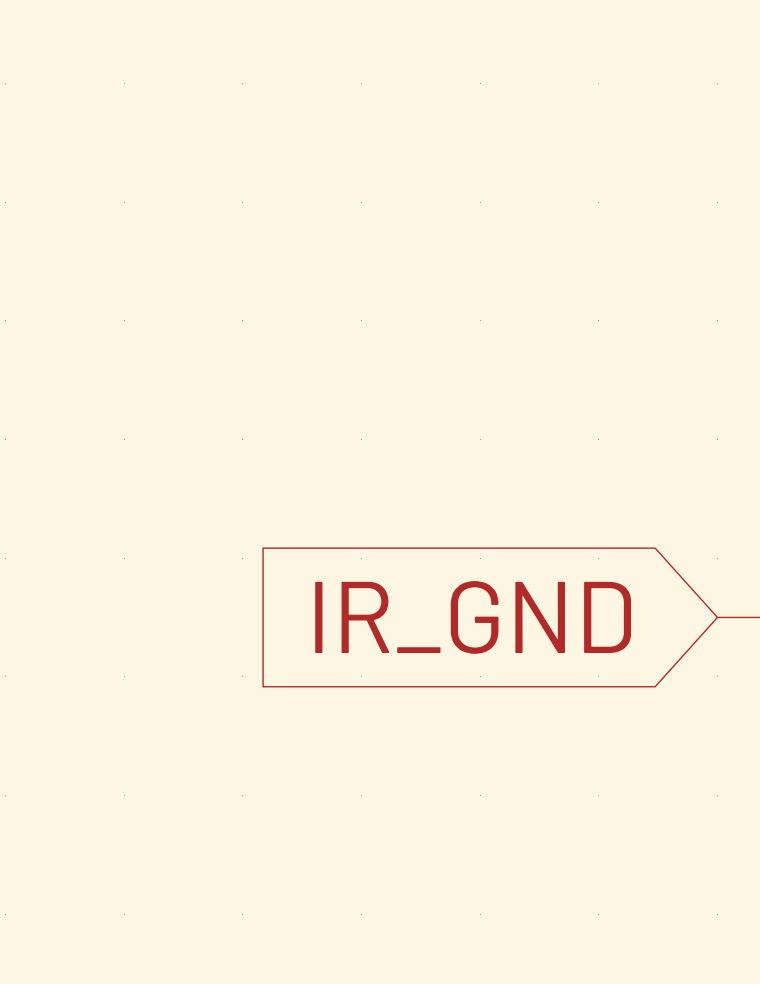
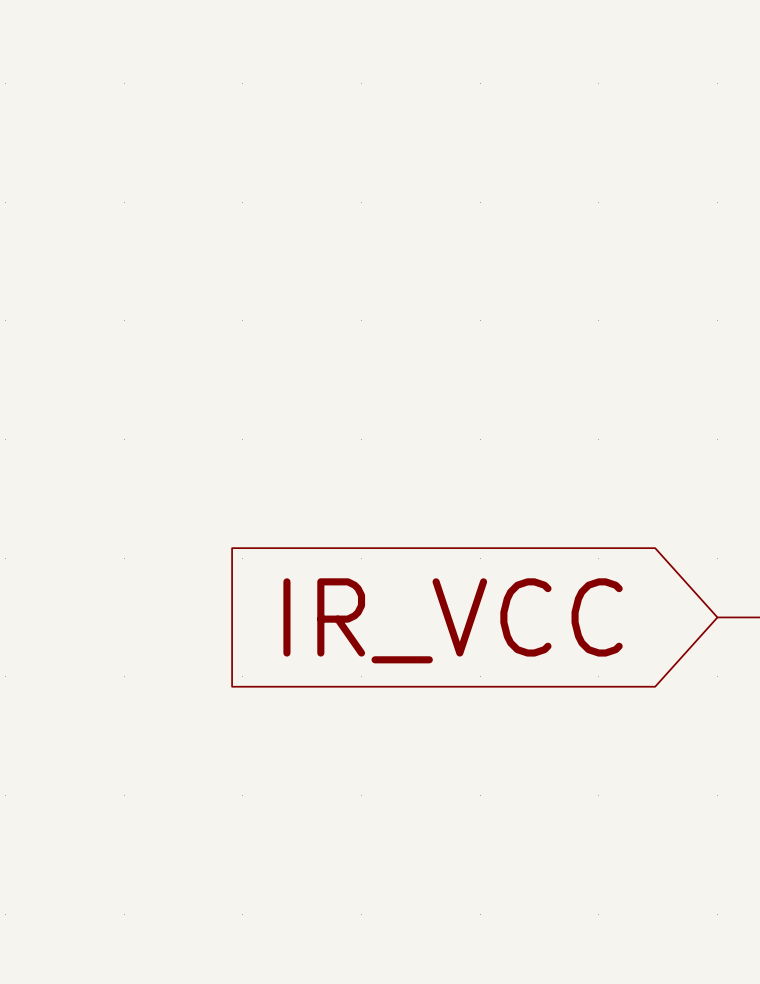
global label: IR_GND (473, 617) -> IR_VCC (453, 620)

